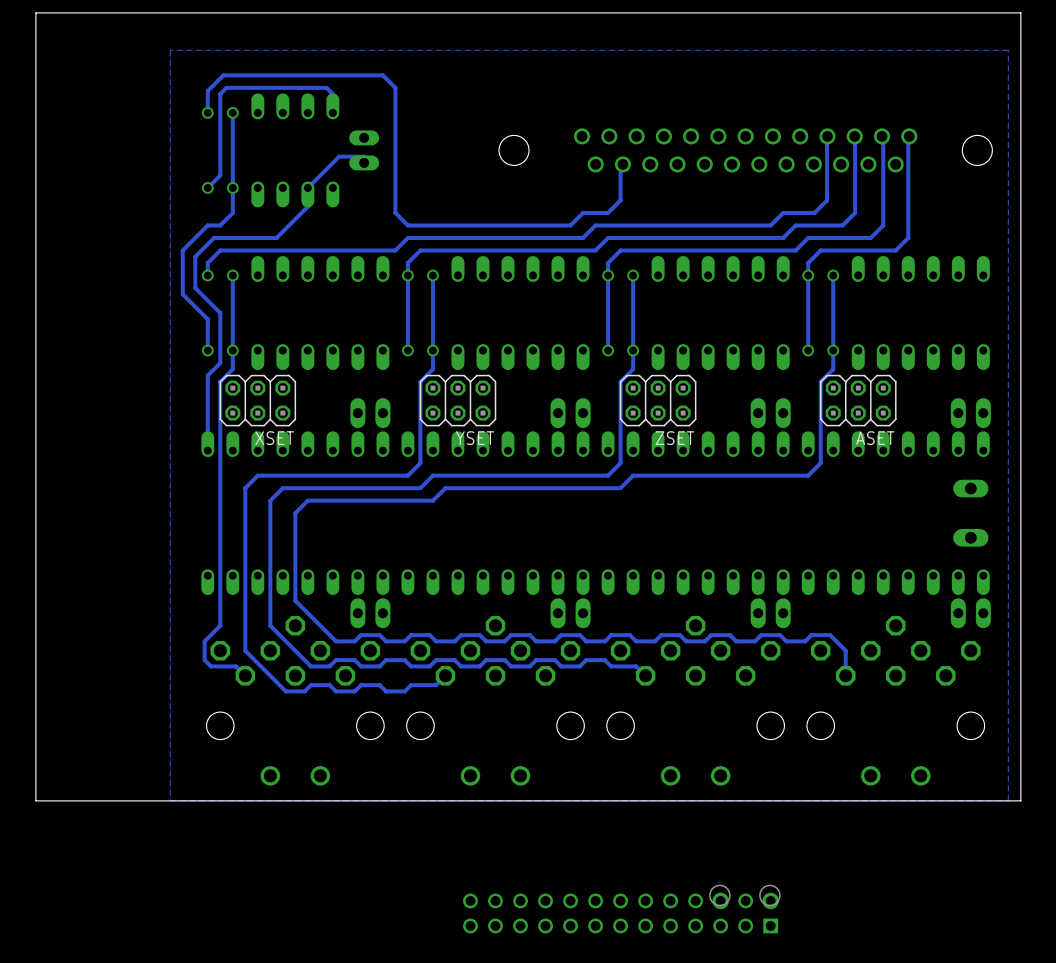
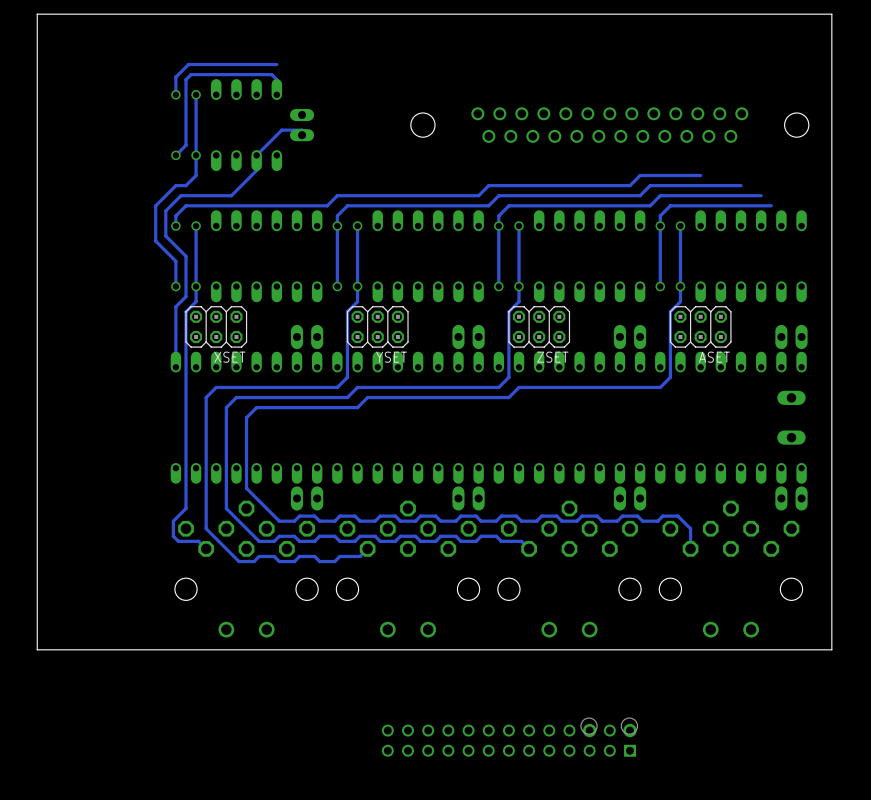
zone outline: (1008, 50) (1008, 800) (170, 800) (170, 50) (1008, 50) -> none
track: (332, 75) (382, 75) (395, 87) (395, 212) (407, 225) (570, 225) (583, 212) (608, 212) (620, 200) (620, 162) -> none
track: (826, 137) (826, 200) (814, 212) -> (700, 175) (665, 175)
track: (855, 137) (855, 212) (842, 225) -> (741, 185) (688, 185)
track: (883, 137) (883, 225) (870, 237) -> (761, 195) (710, 195)
track: (908, 137) (908, 237) (895, 250) -> (771, 205) (730, 205)

